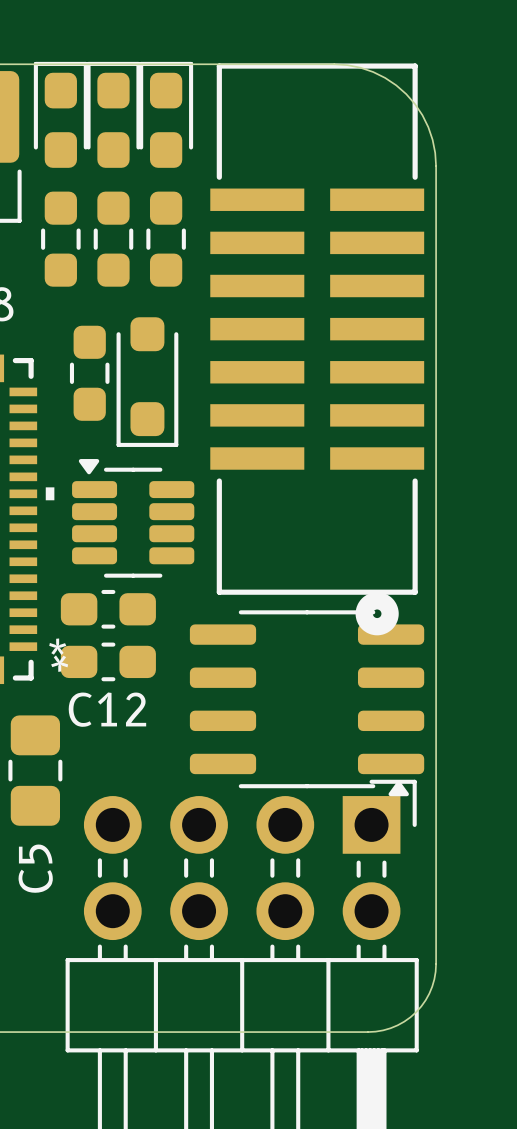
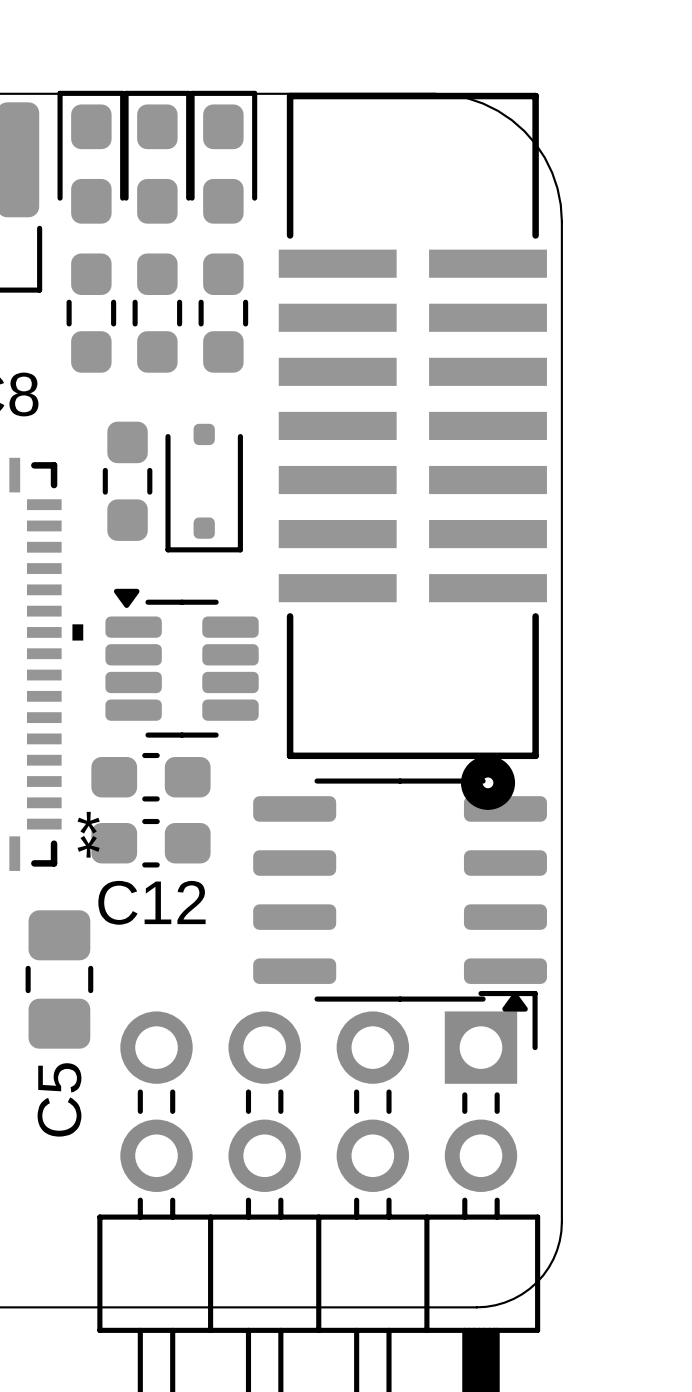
part footprint: [116, 317, 179, 447] -> [165, 423, 243, 553]

